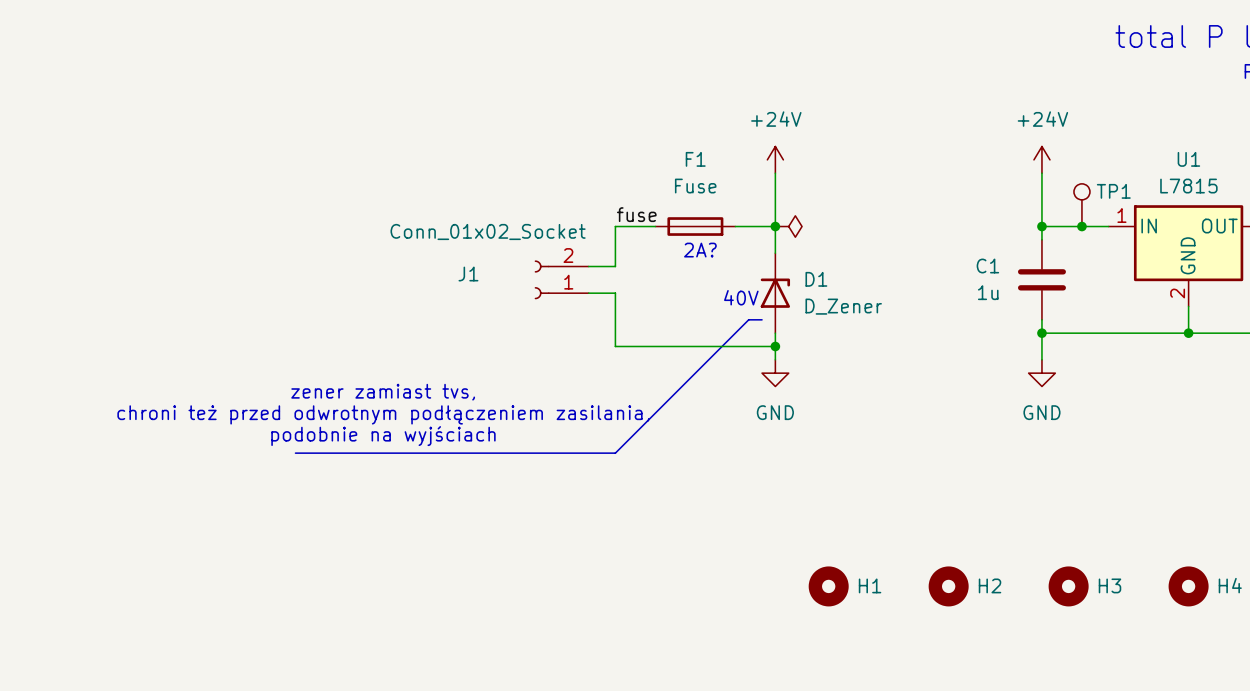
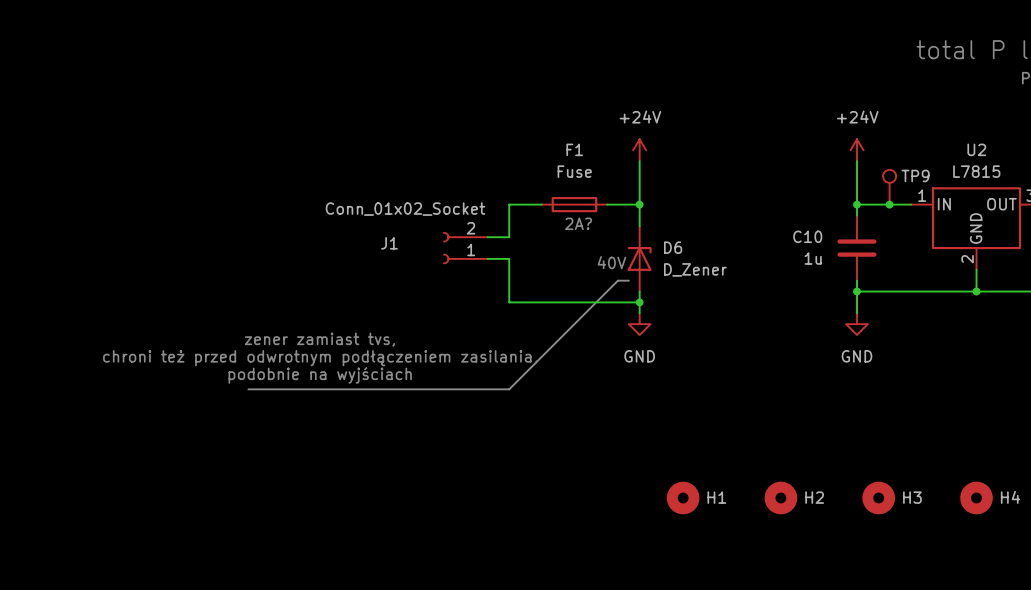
U1 name: U1 (1188, 159) -> U2 (976, 149)
TP1 name: TP1 (1113, 191) -> TP9 (915, 175)
label: fuse (636, 214) -> none
power symbol: (788, 226) -> none
C1 name: C1 (987, 266) -> C10 (807, 236)
D1 name: D1 (816, 279) -> D6 (673, 247)

